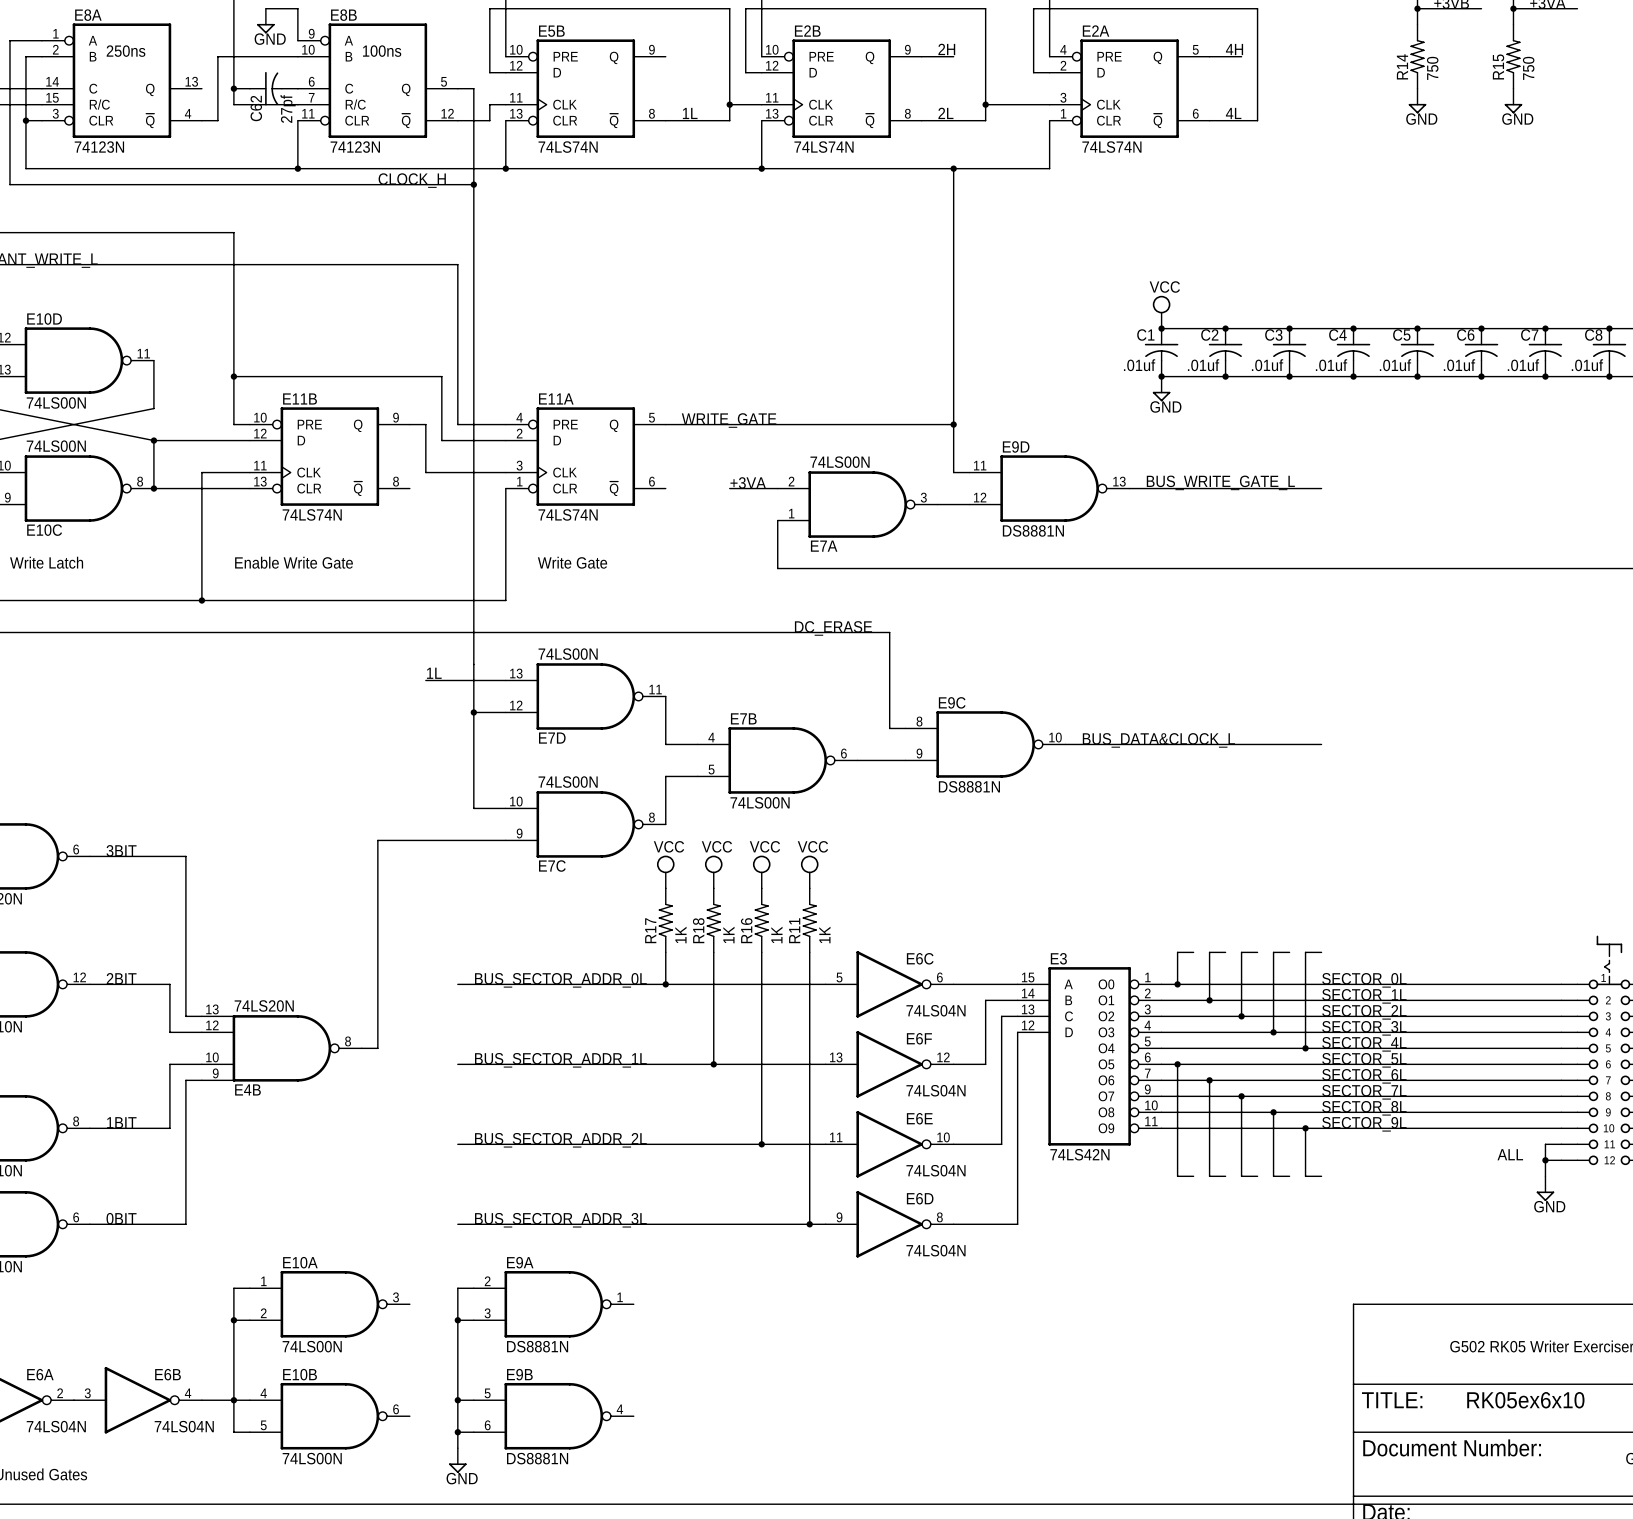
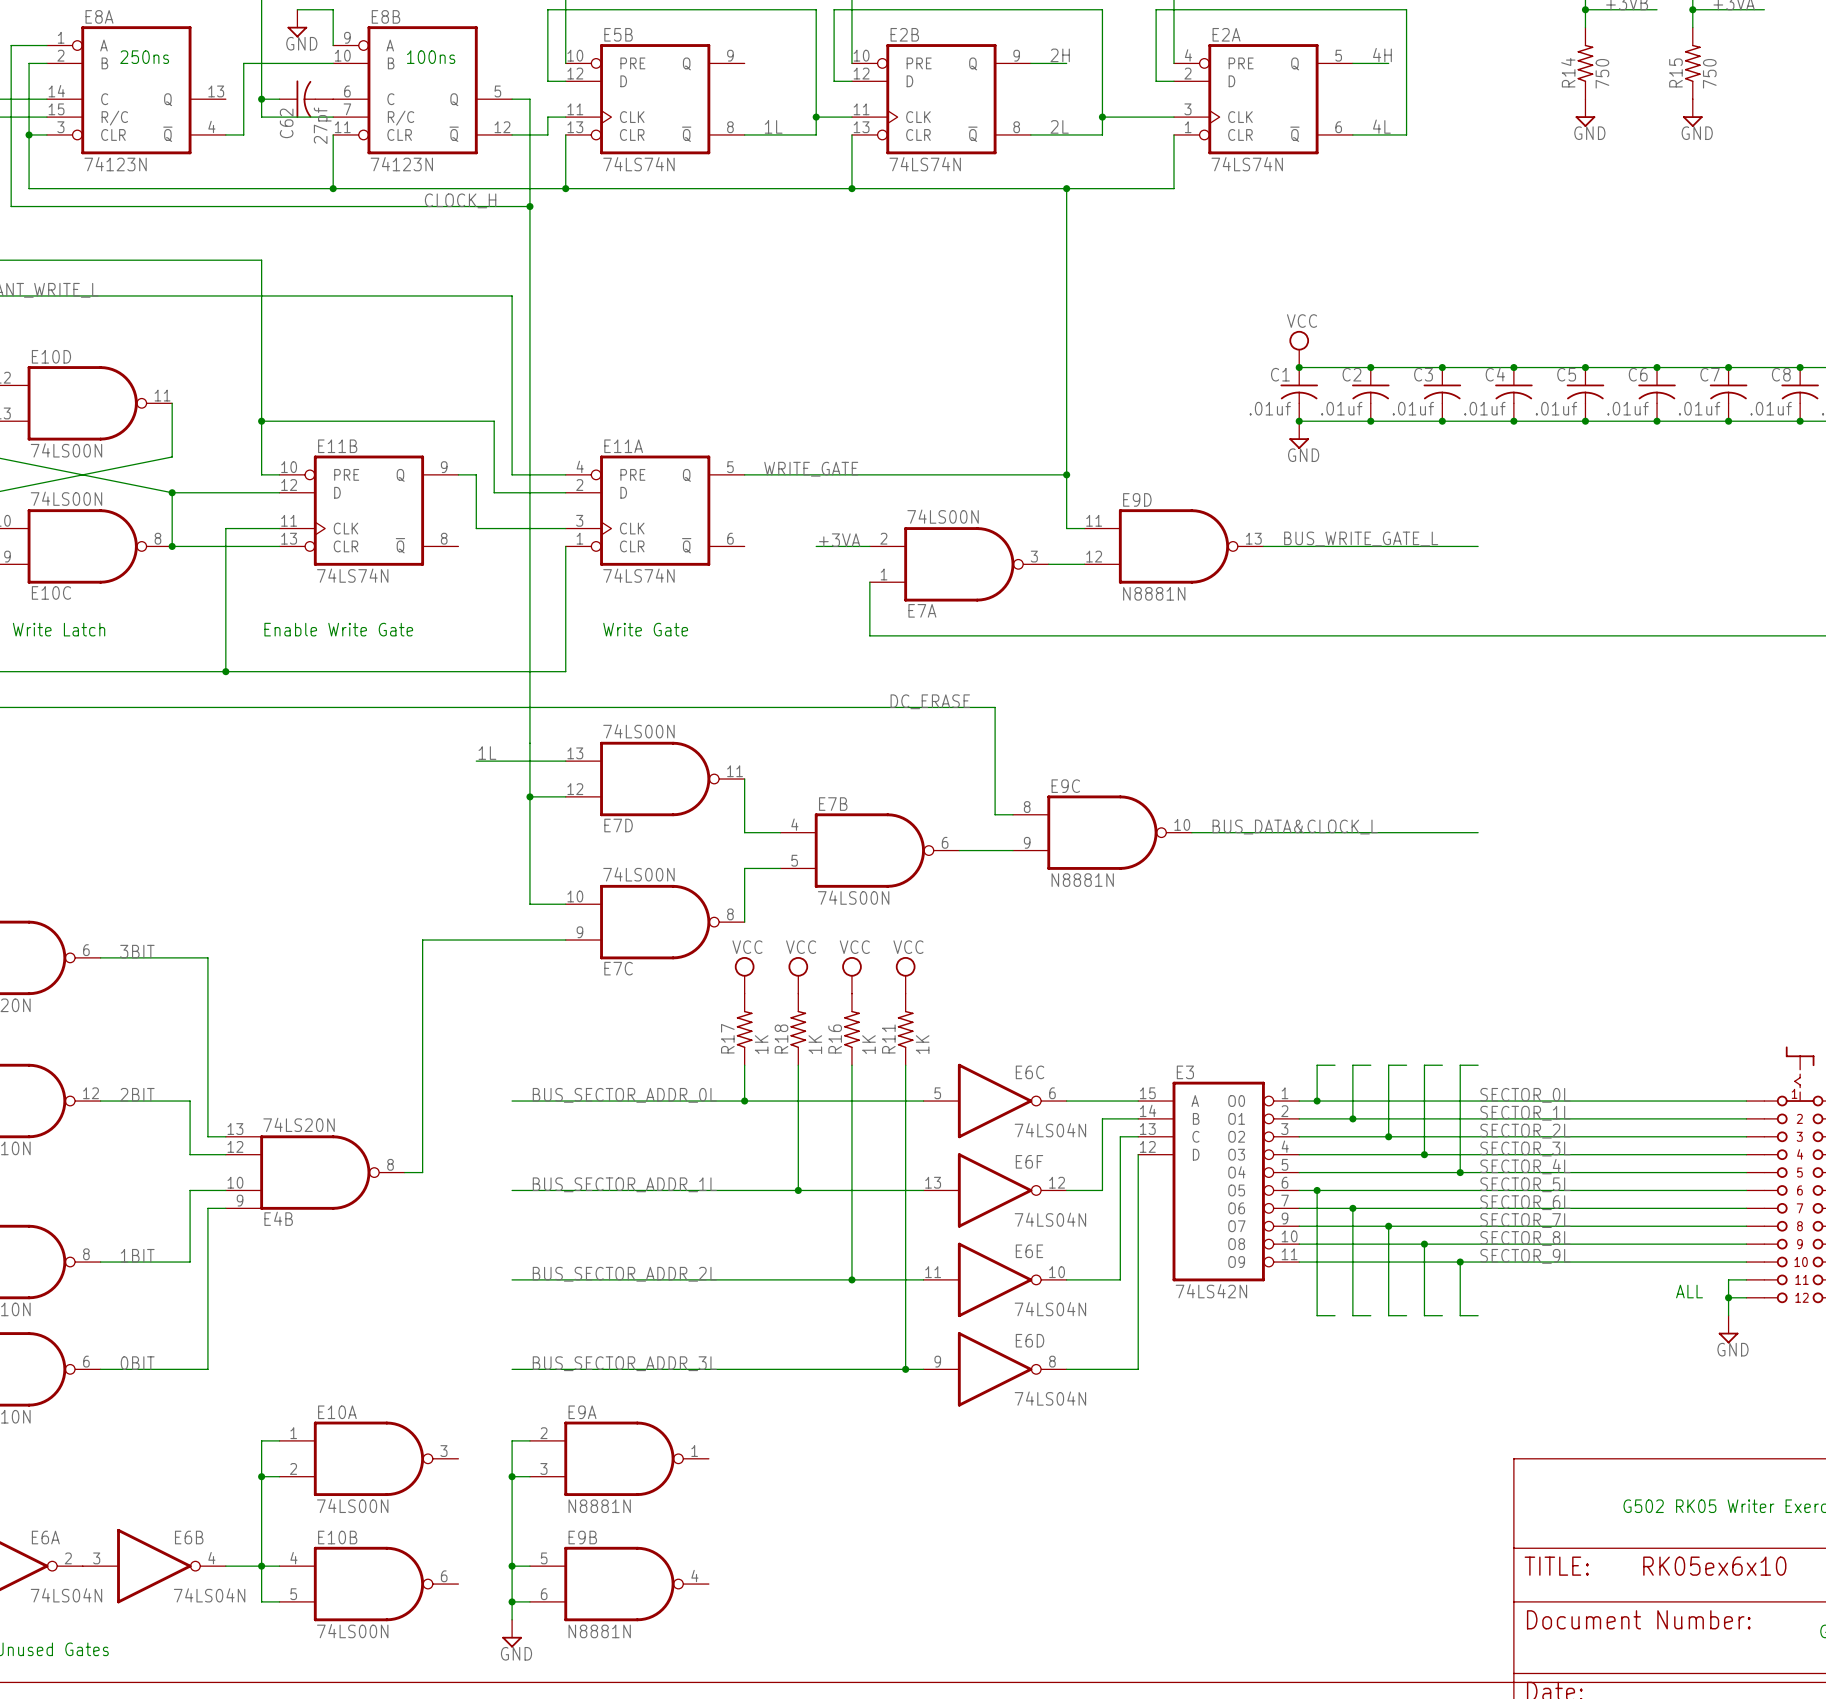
E9D value: DS8881N (1033, 530) -> N8881N (1154, 593)
E9C value: DS8881N (969, 786) -> N8881N (1082, 880)
E9A value: DS8881N (537, 1346) -> N8881N (599, 1506)
E9B value: DS8881N (537, 1458) -> N8881N (599, 1631)

